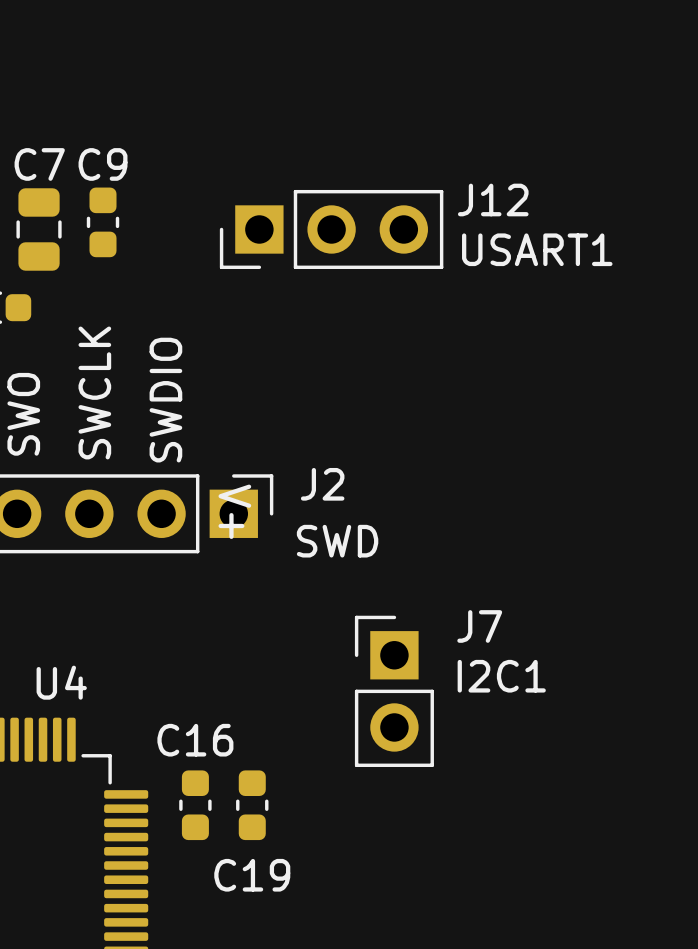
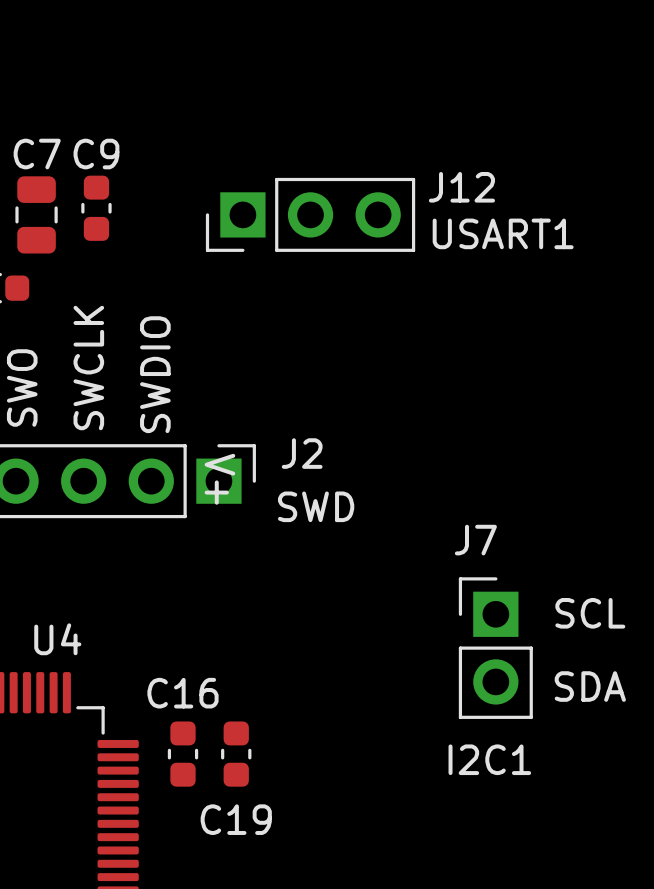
J7 name position: J7 (479, 626) -> J7 (475, 540)
J7 text: none -> SCL (590, 613)
J7 value position: I2C1 (501, 676) -> I2C1 (489, 759)
J7 position: (394, 691) -> (495, 648)
J7 text: none -> SDA (590, 686)

